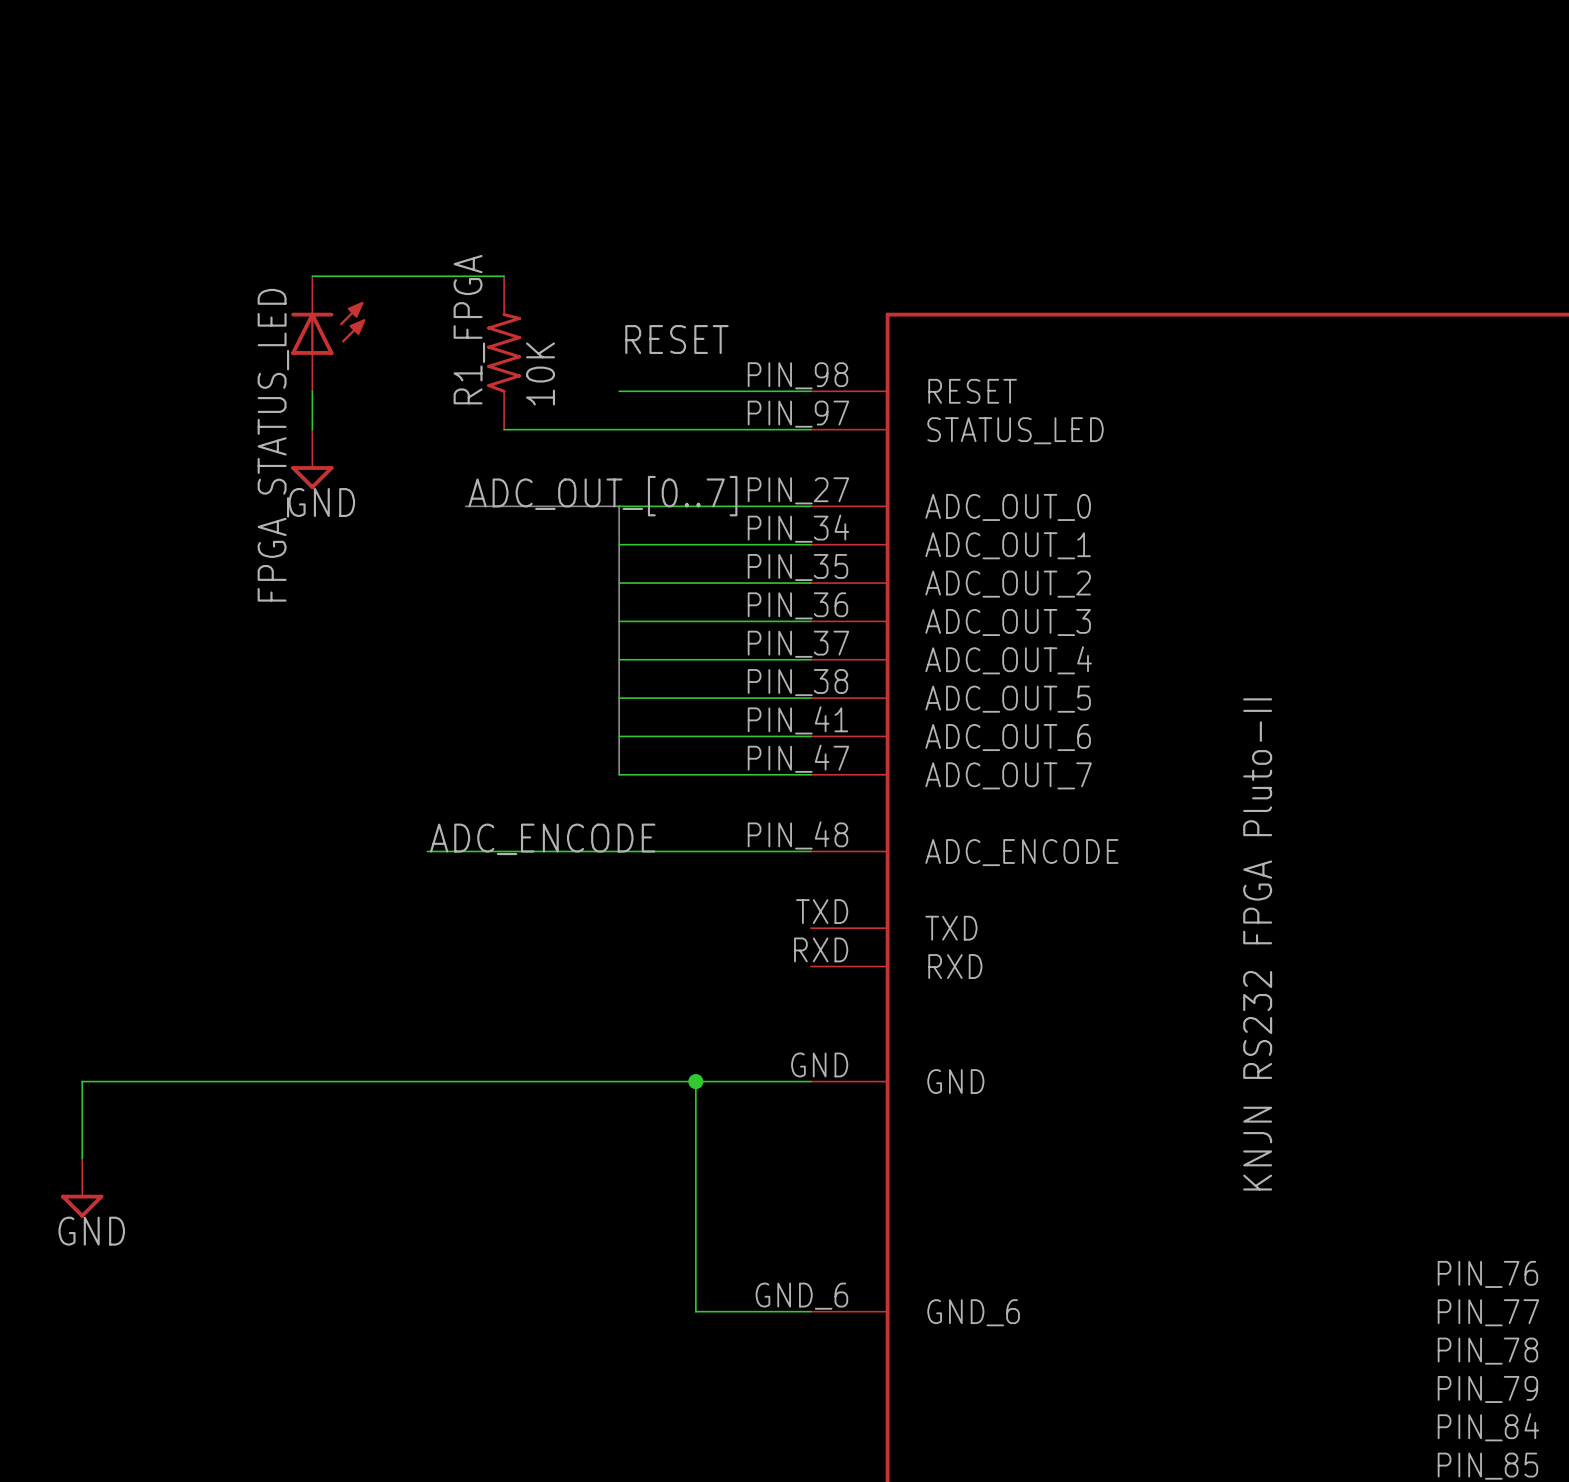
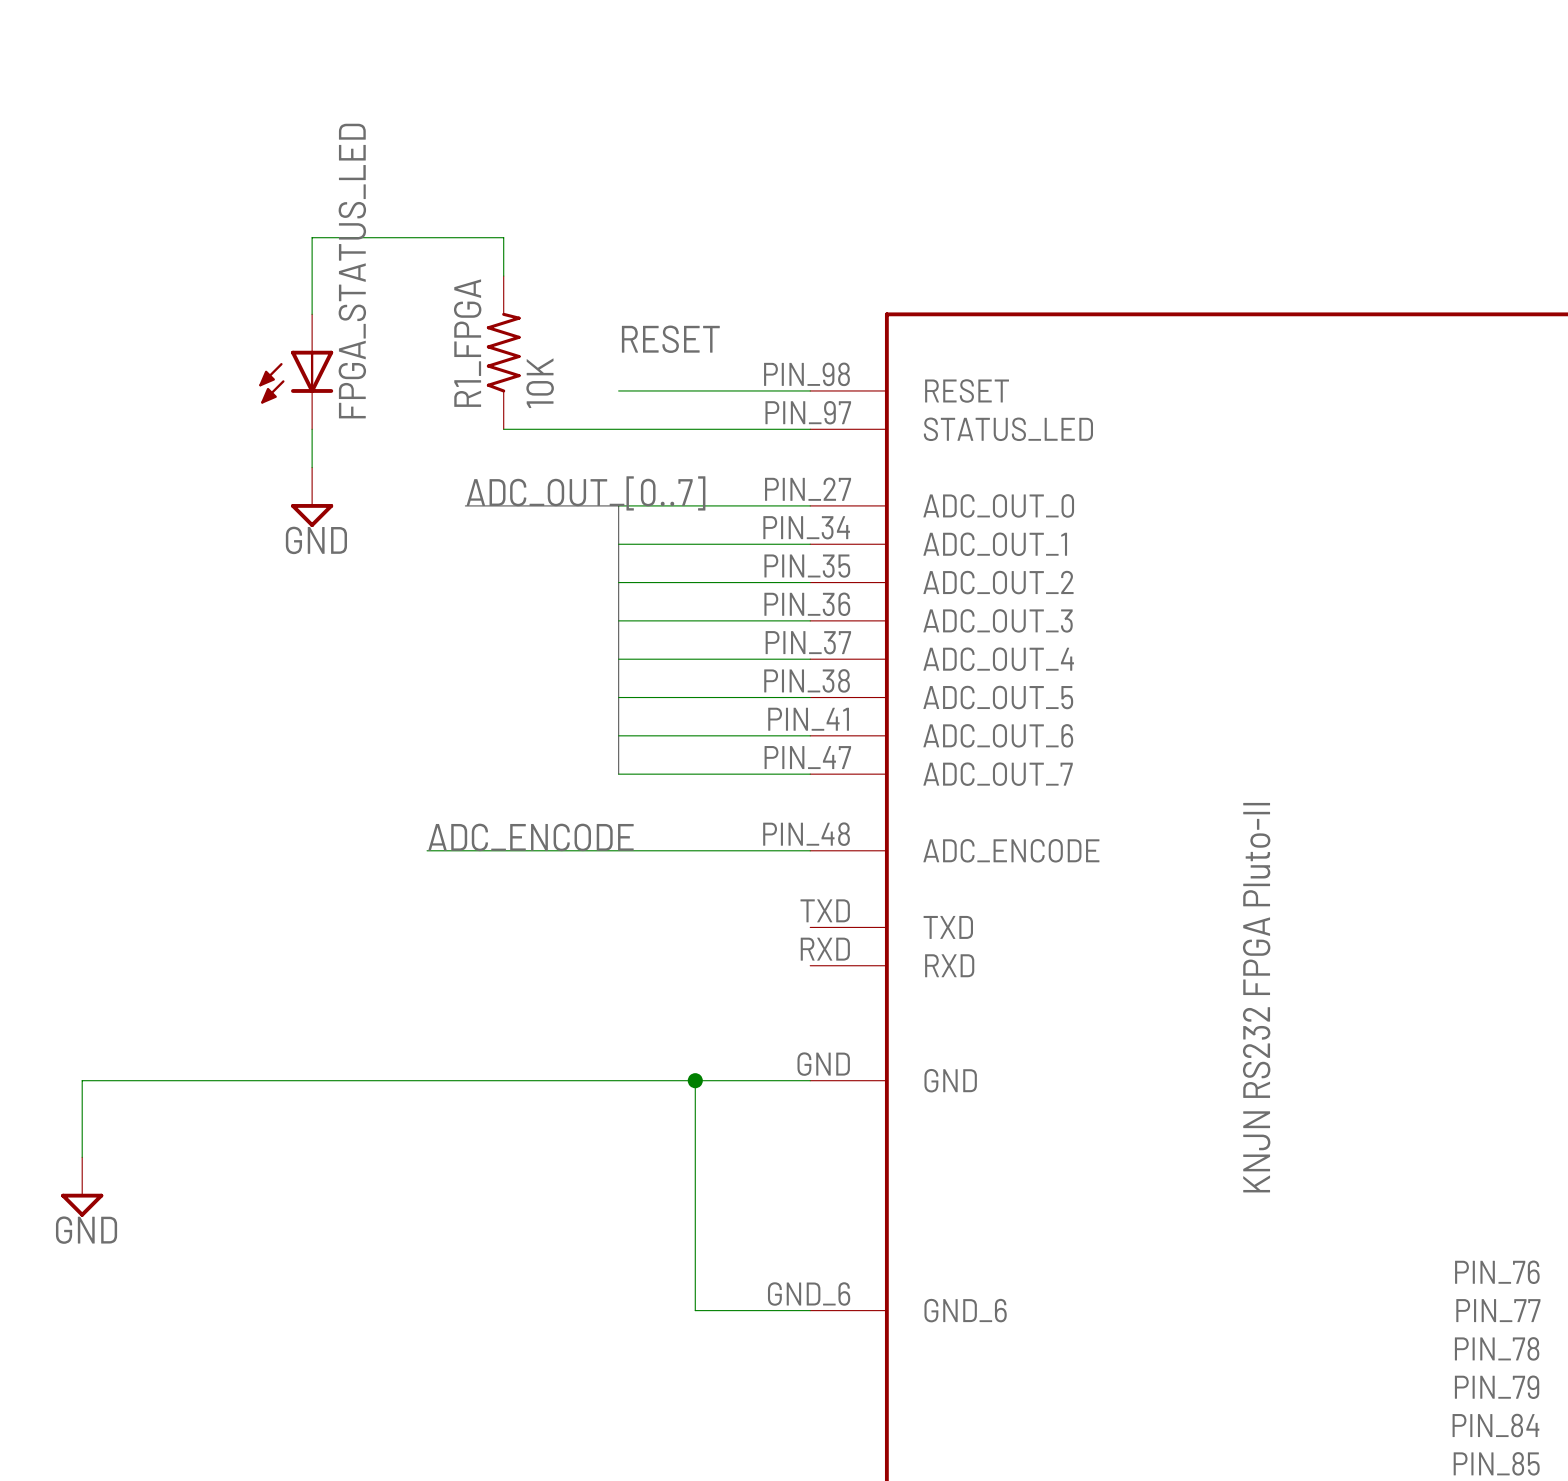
wire: (312, 276) (504, 276) -> (312, 314) (312, 237) (503, 237) (503, 276)
FPGA_STATUS_LED rotation: 0° (328, 328) -> 180° (296, 377)
power symbol position: GND (312, 459) -> GND (312, 497)

